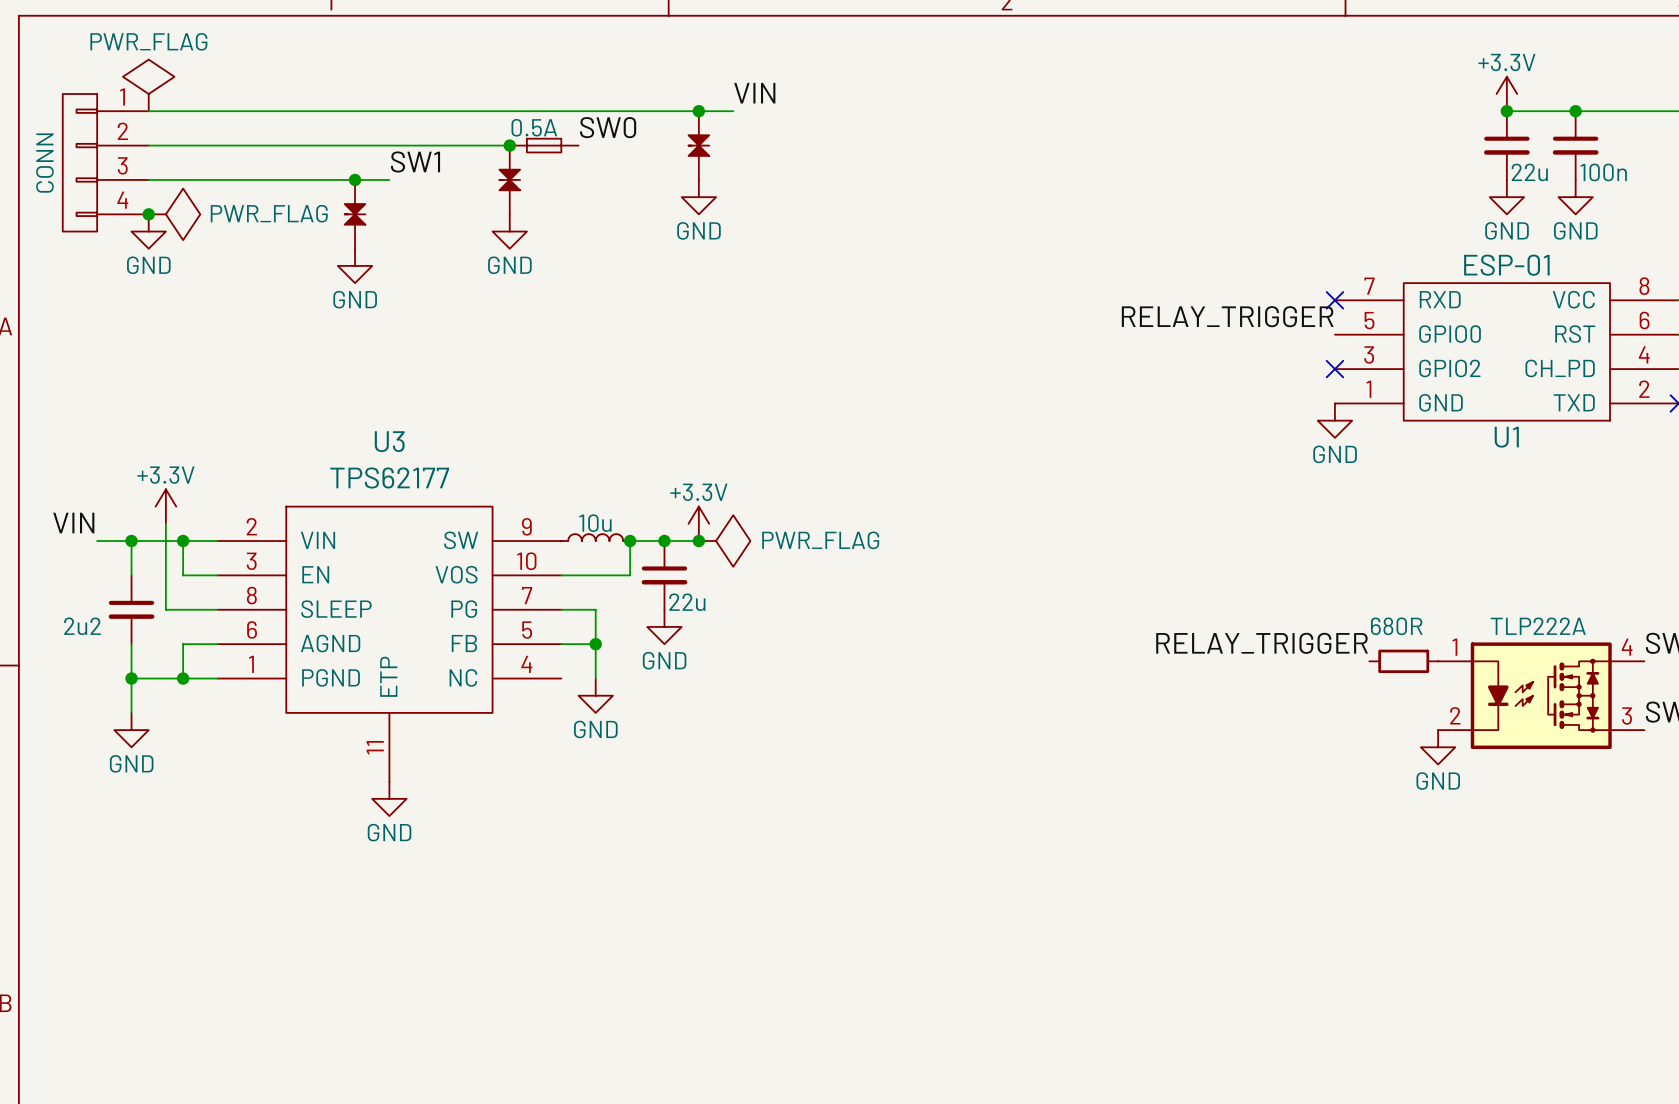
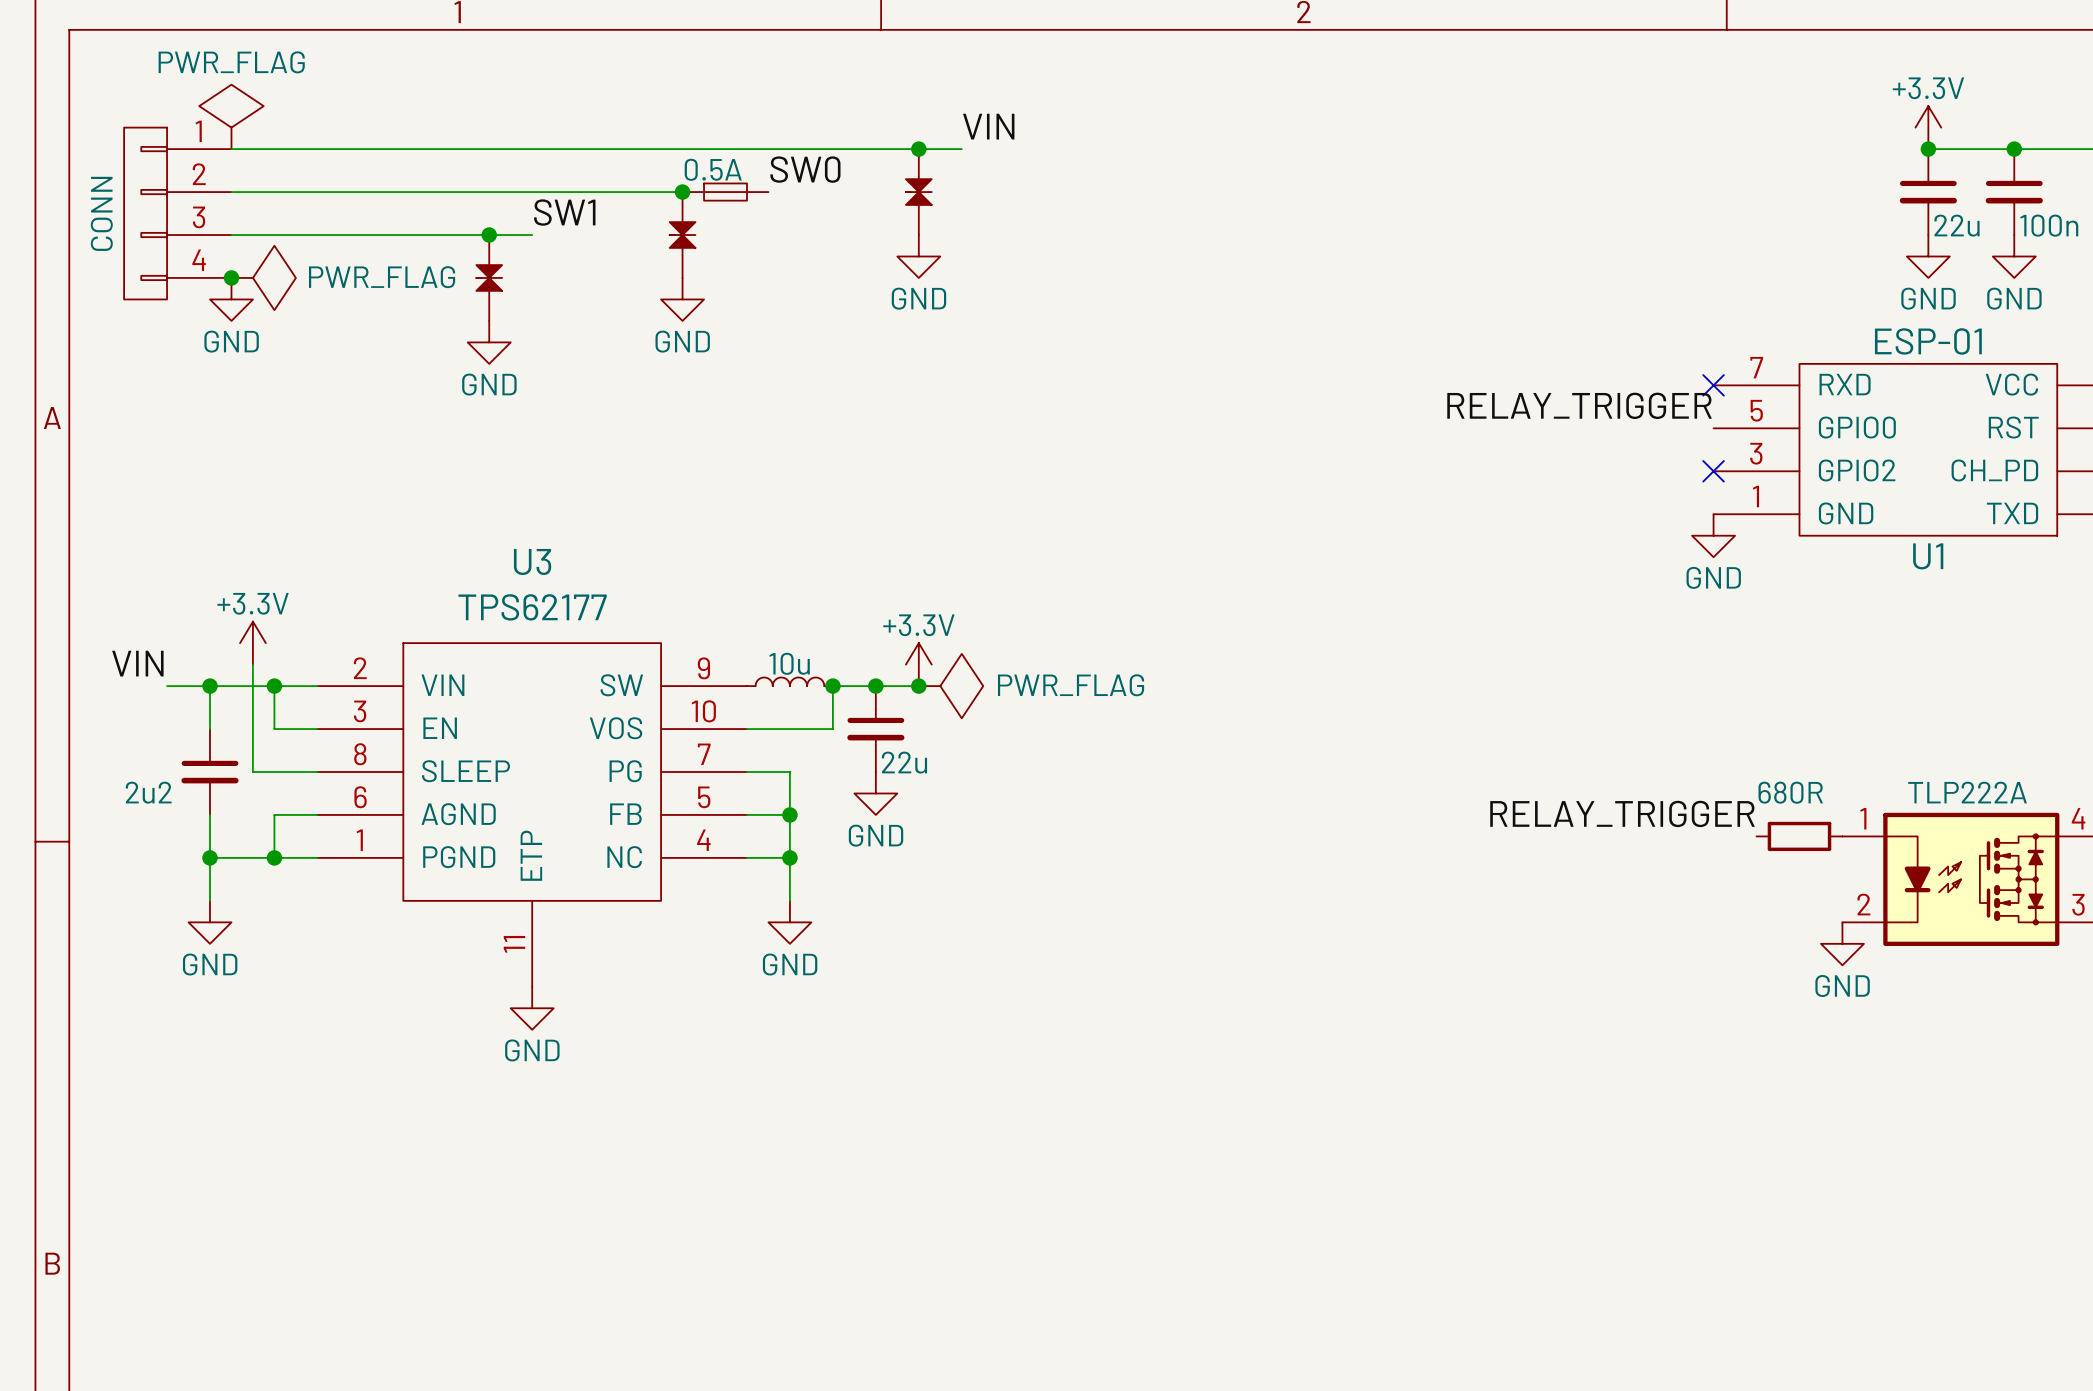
wire: none -> (746, 857) (789, 857) (789, 900)
junction: none -> (789, 857)
power symbol position: GND (595, 695) -> GND (789, 922)

